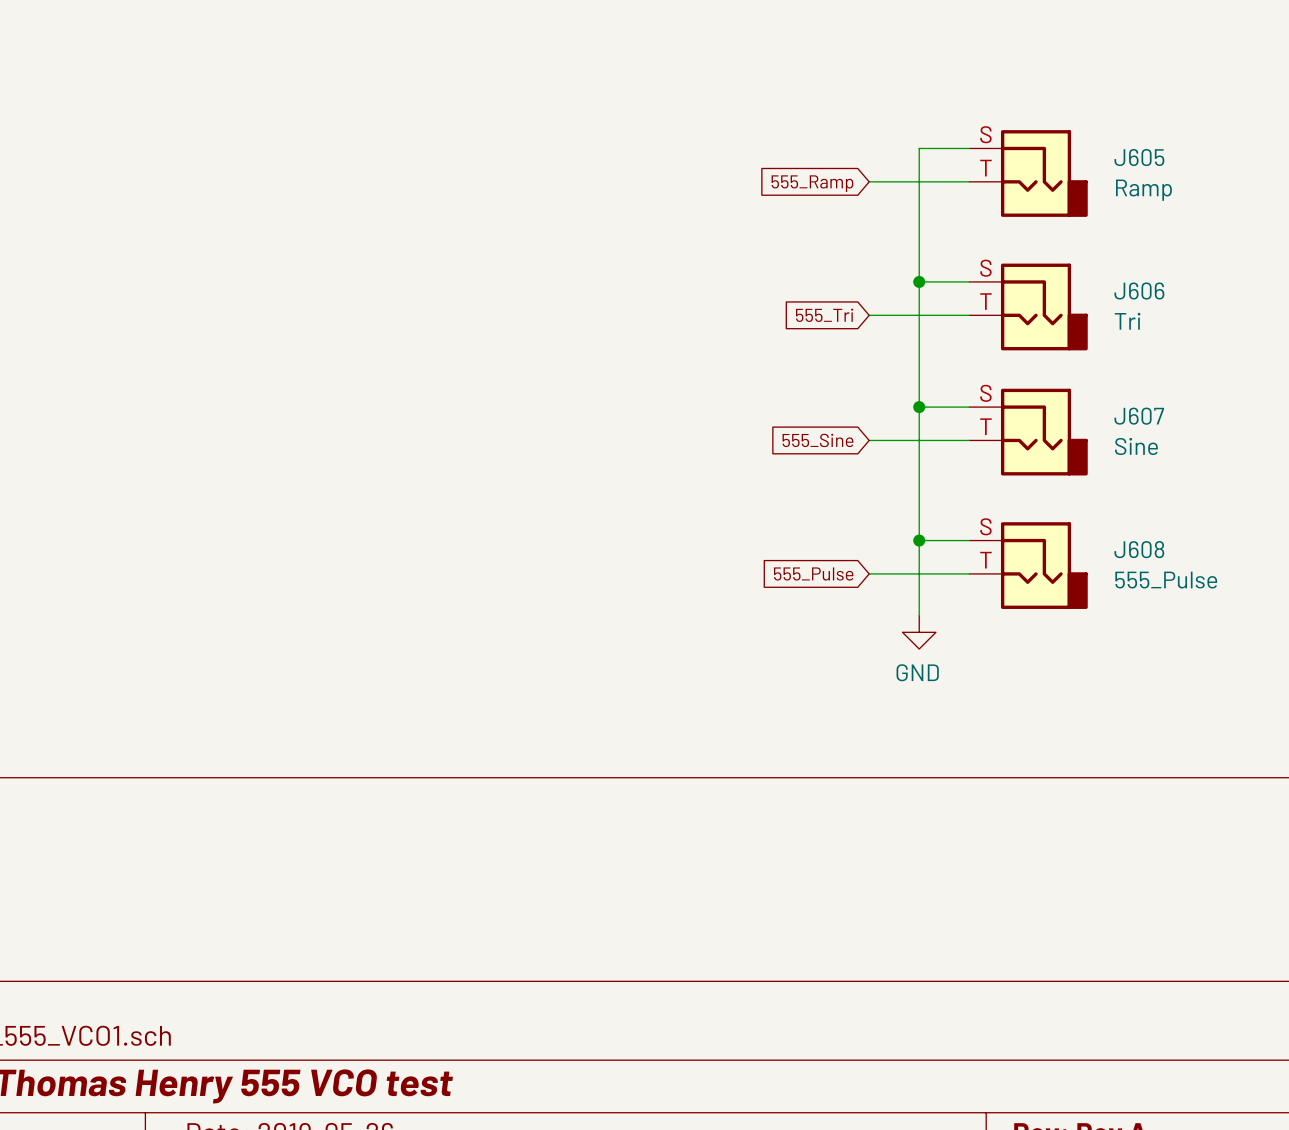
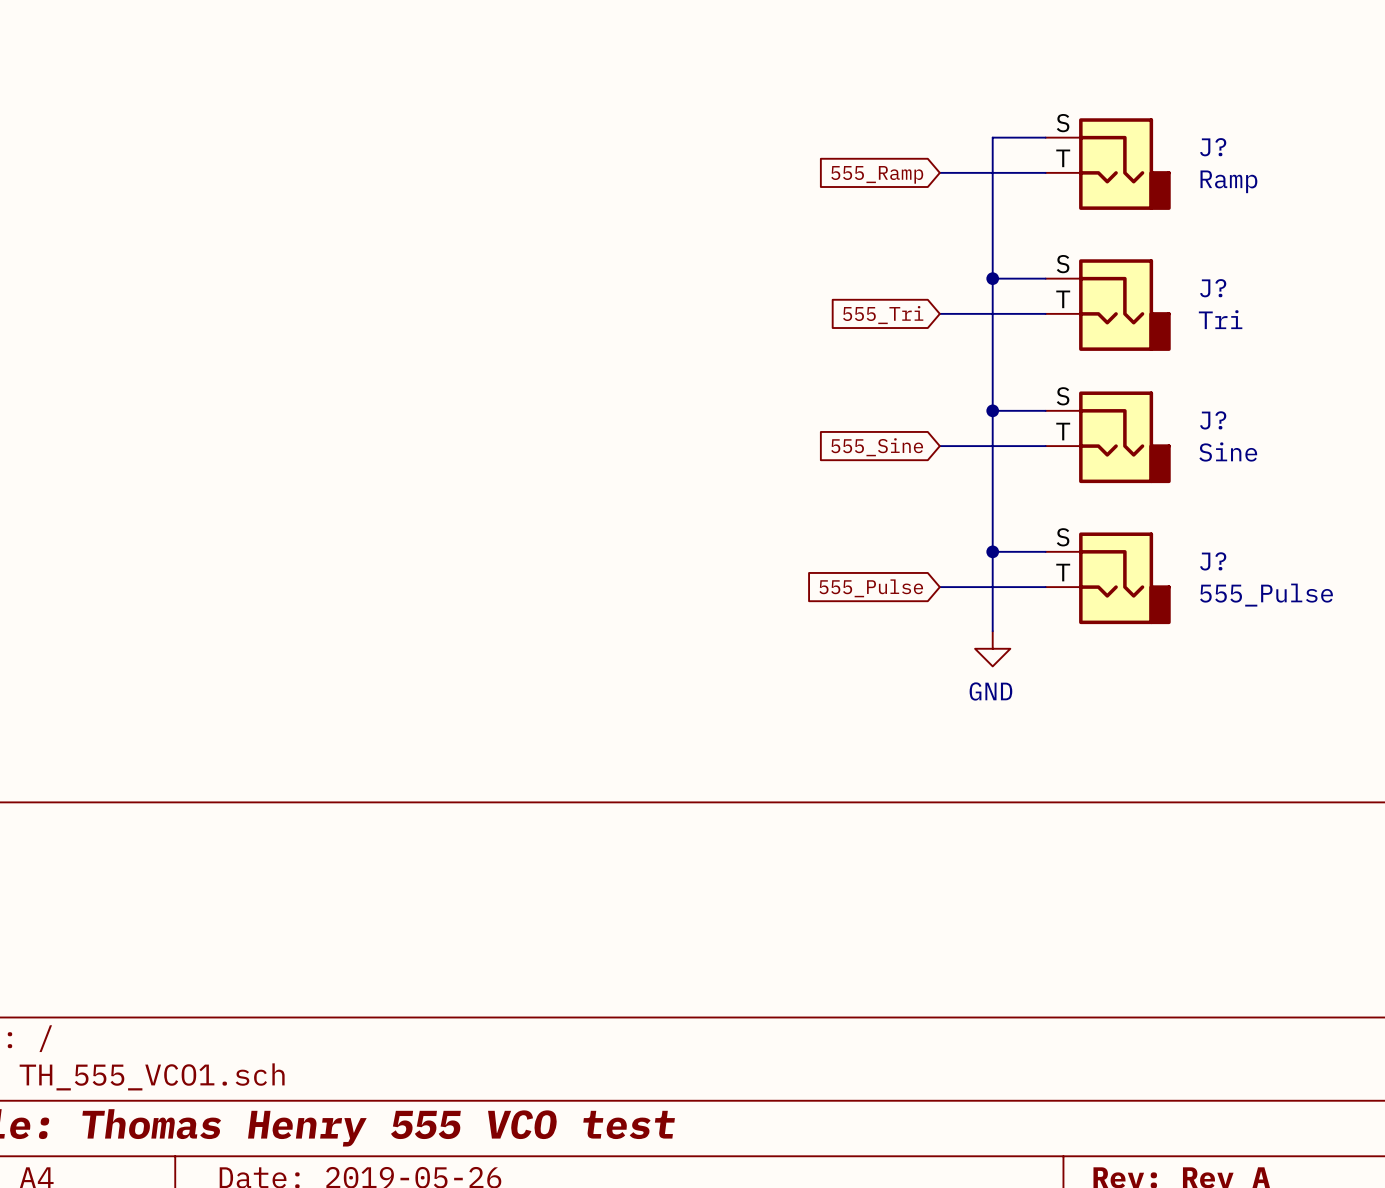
J605 name: J605 (1139, 157) -> J? (1213, 147)
J606 name: J606 (1139, 291) -> J? (1213, 288)
J607 name: J607 (1139, 416) -> J? (1213, 420)
J608 name: J608 (1139, 549) -> J? (1213, 561)

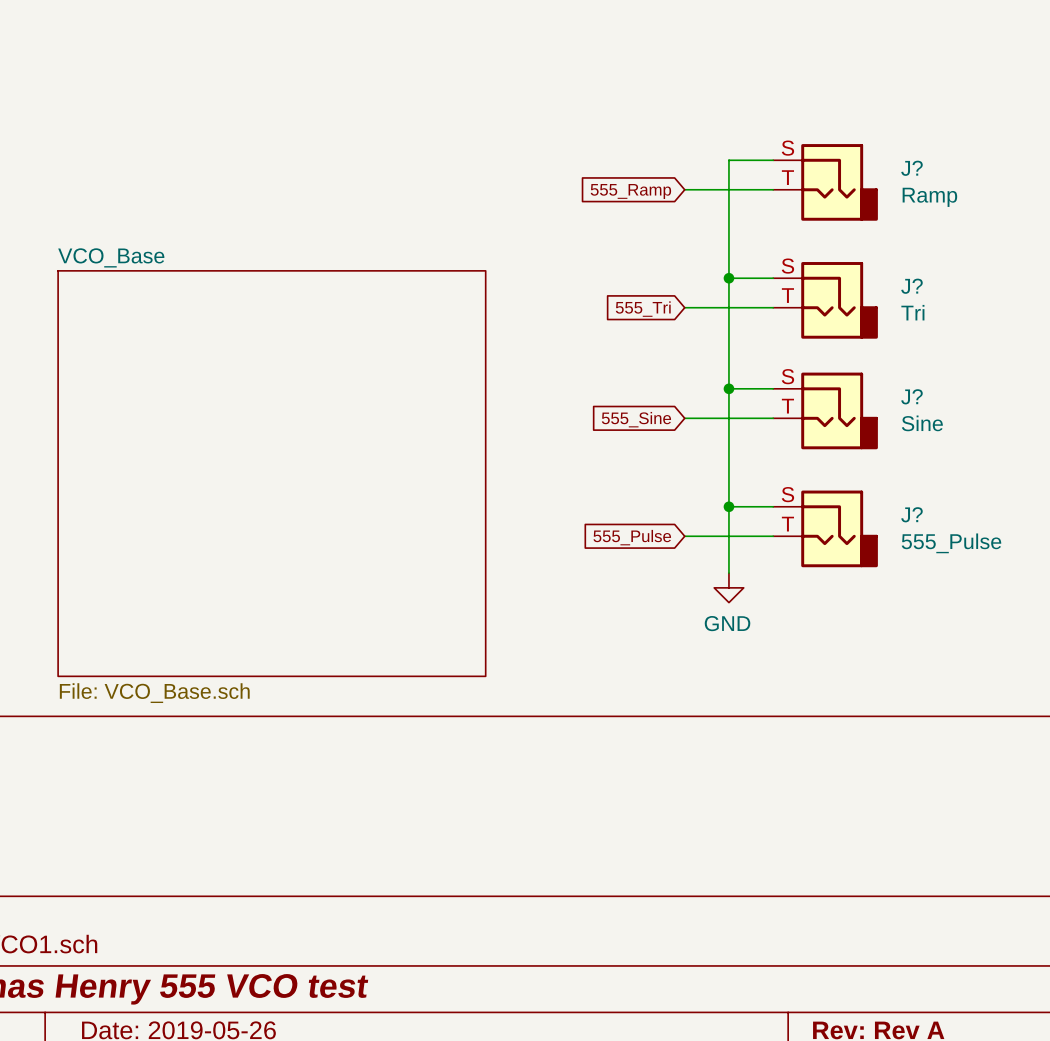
sheet VCO_Base: none -> File: VCO_Base.sch (271, 473)

